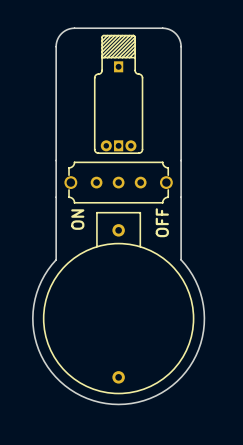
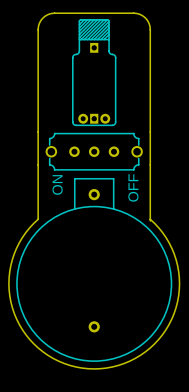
board edge: (56, 257) (56, 259) -> (38, 219) (22, 237) (10, 265) (9, 289) (14, 313) (29, 339) (48, 355) (70, 365) (94, 368) (118, 365) (145, 351) (162, 334) (174, 313) (179, 289) (177, 265) (169, 242) (150, 219)
board edge: (181, 259) (192, 275) (202, 298) (204, 324) (198, 349) (185, 371) (167, 389) (144, 400) (118, 404) (93, 400) (70, 389) (55, 376) (41, 355) (33, 331) (33, 305) (41, 280) (56, 259) -> none
part: (118, 303) -> none
part: none -> (94, 270)

